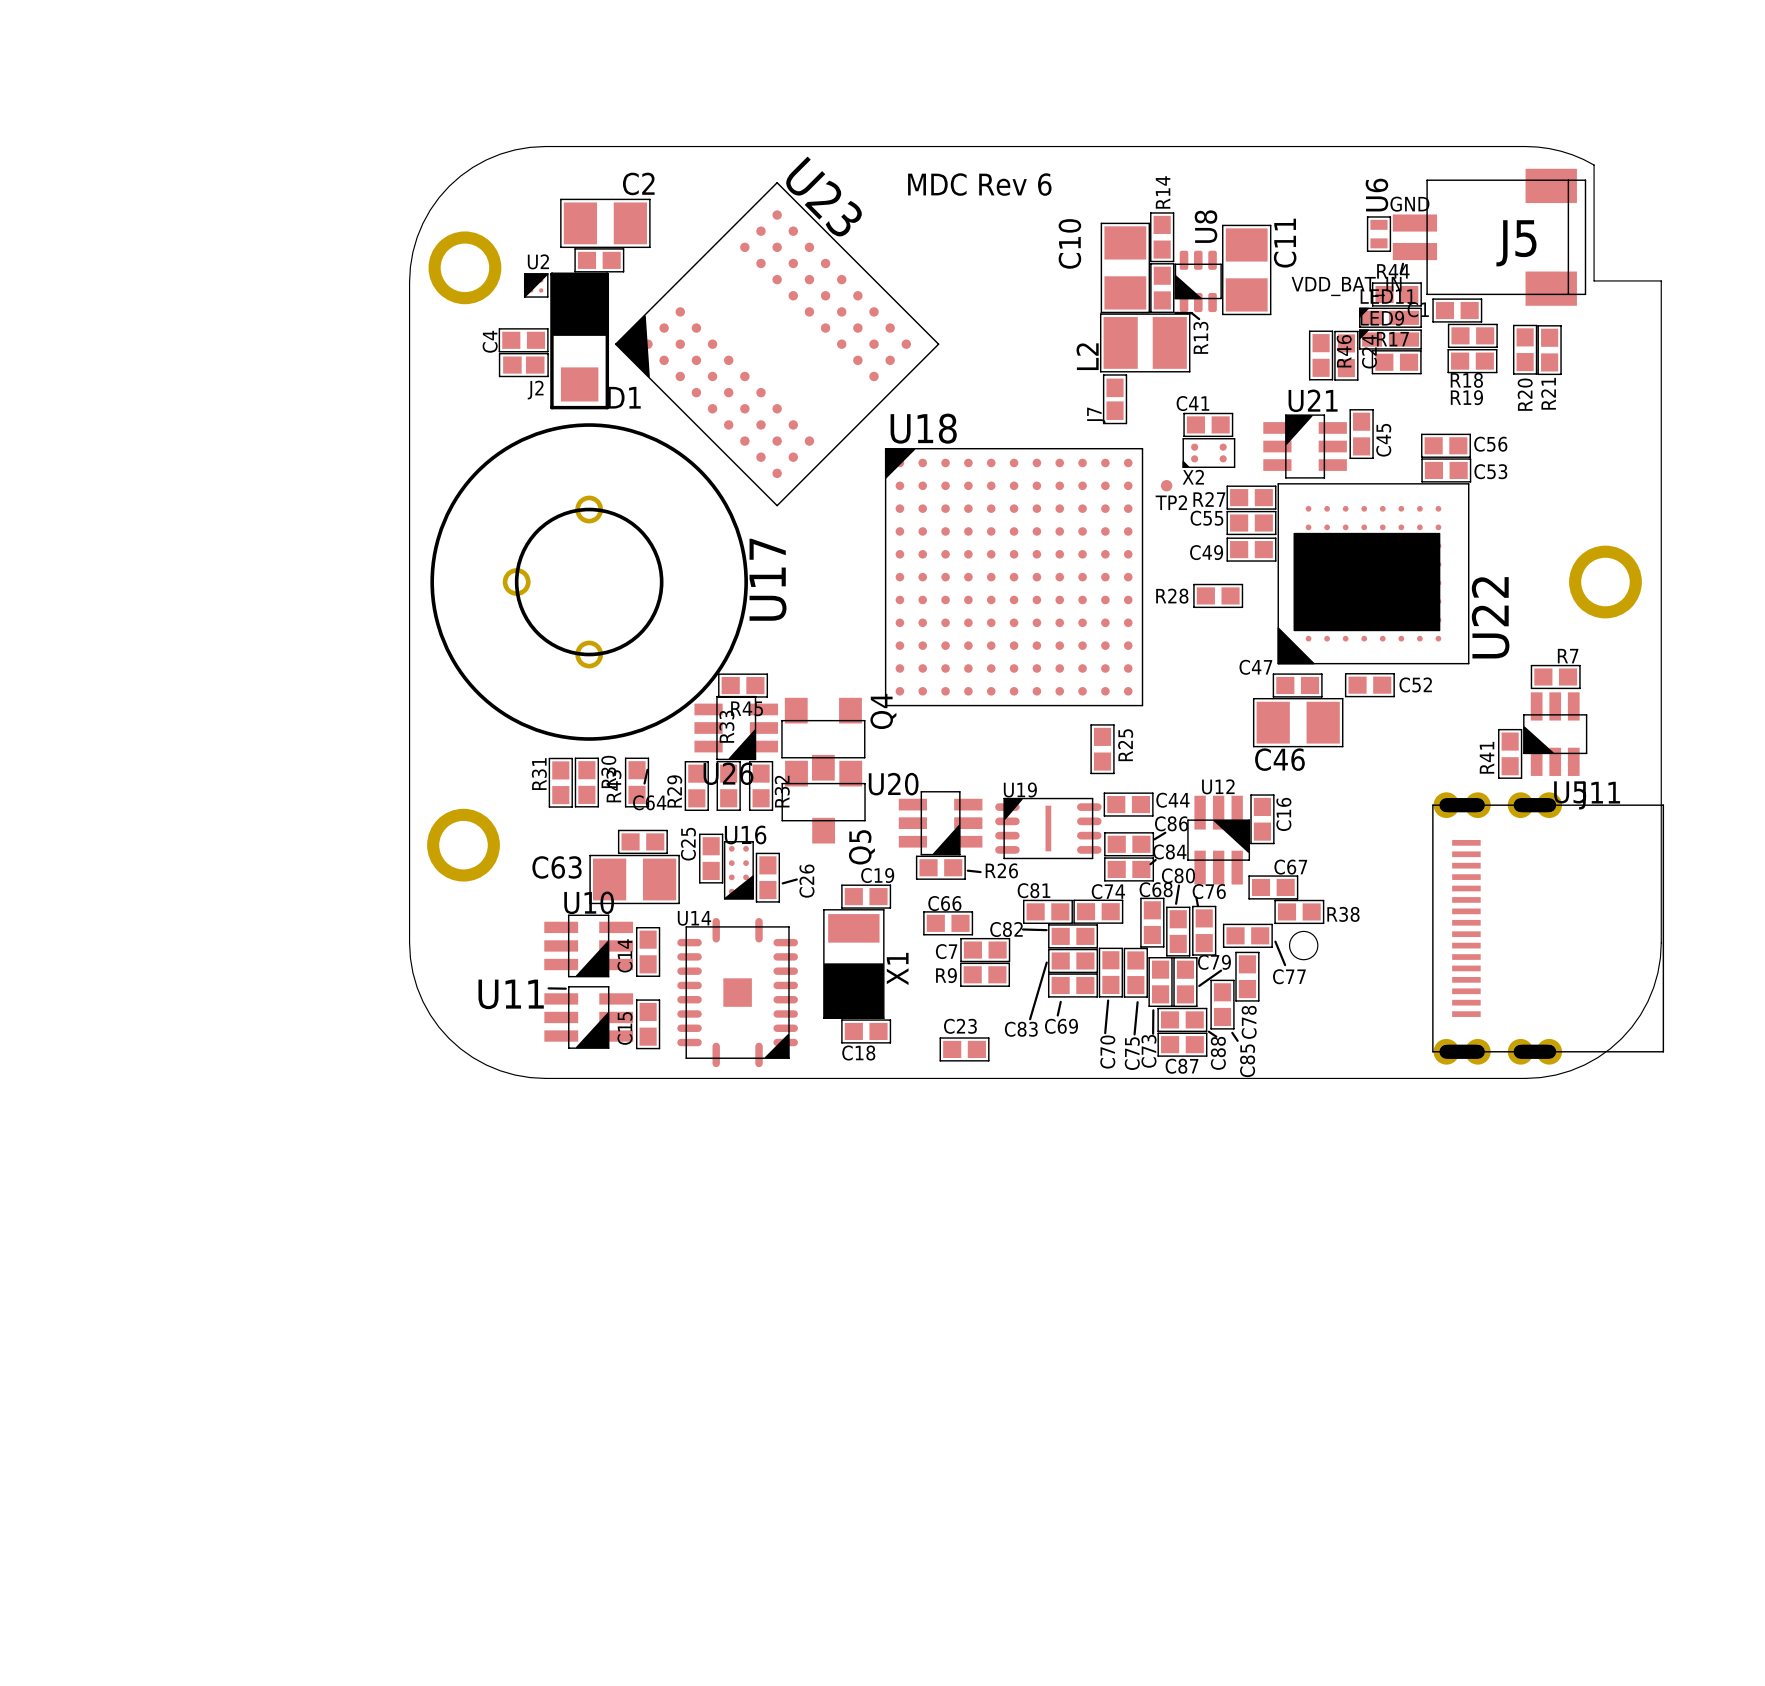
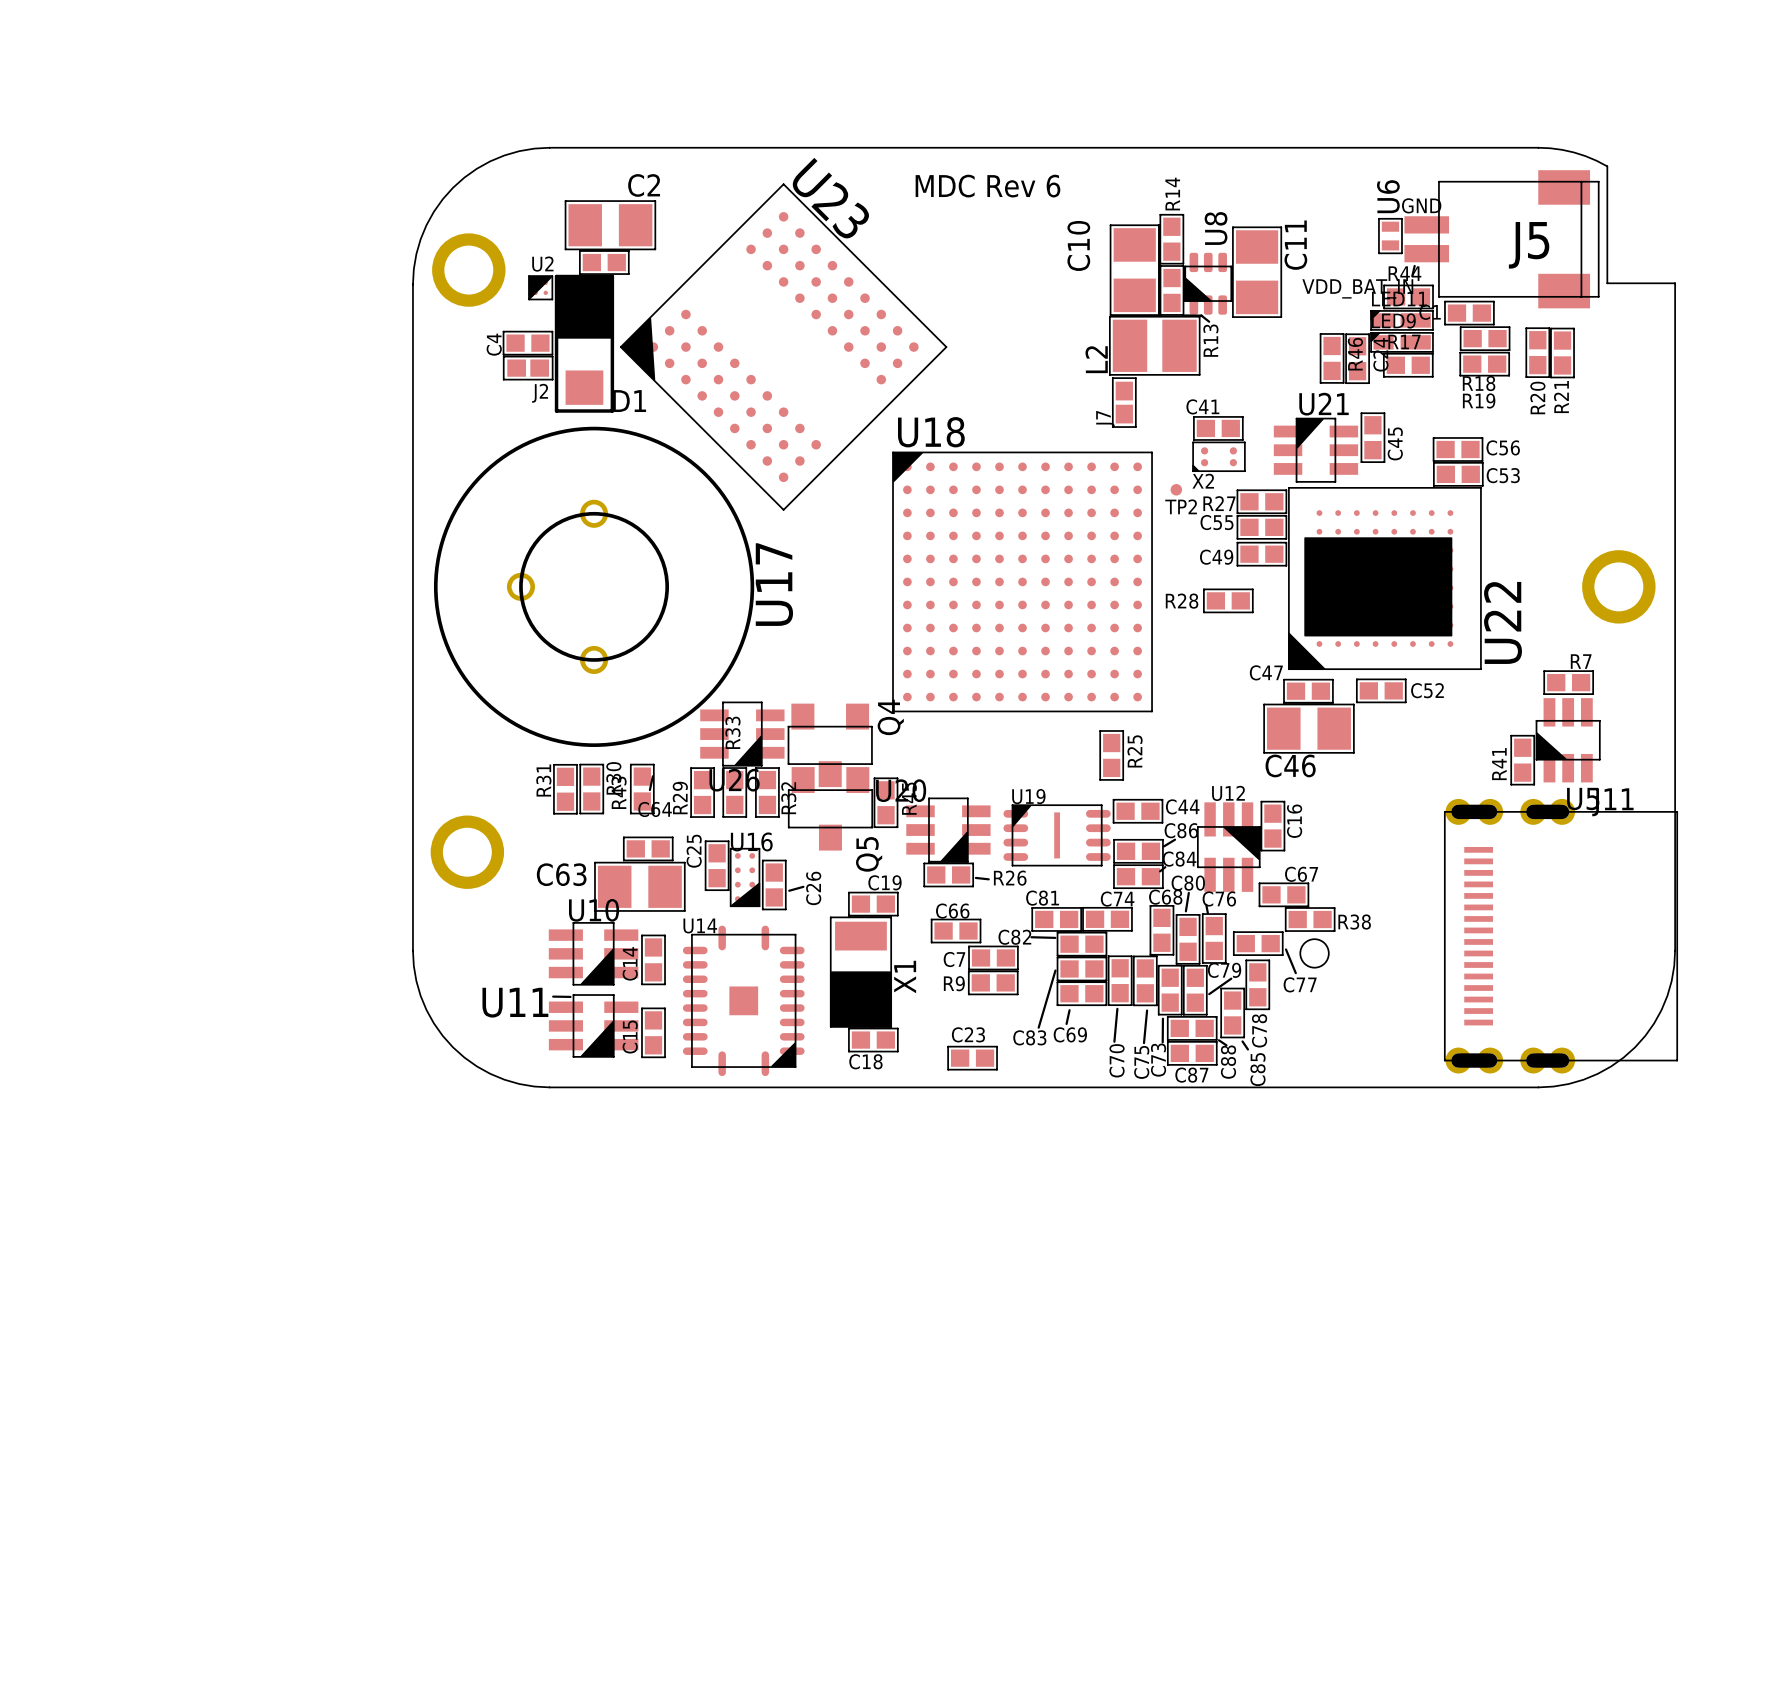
R45 rotation: 0° (743, 685) -> 90° clockwise (886, 802)
R45 position: (743, 685) -> (886, 802)

